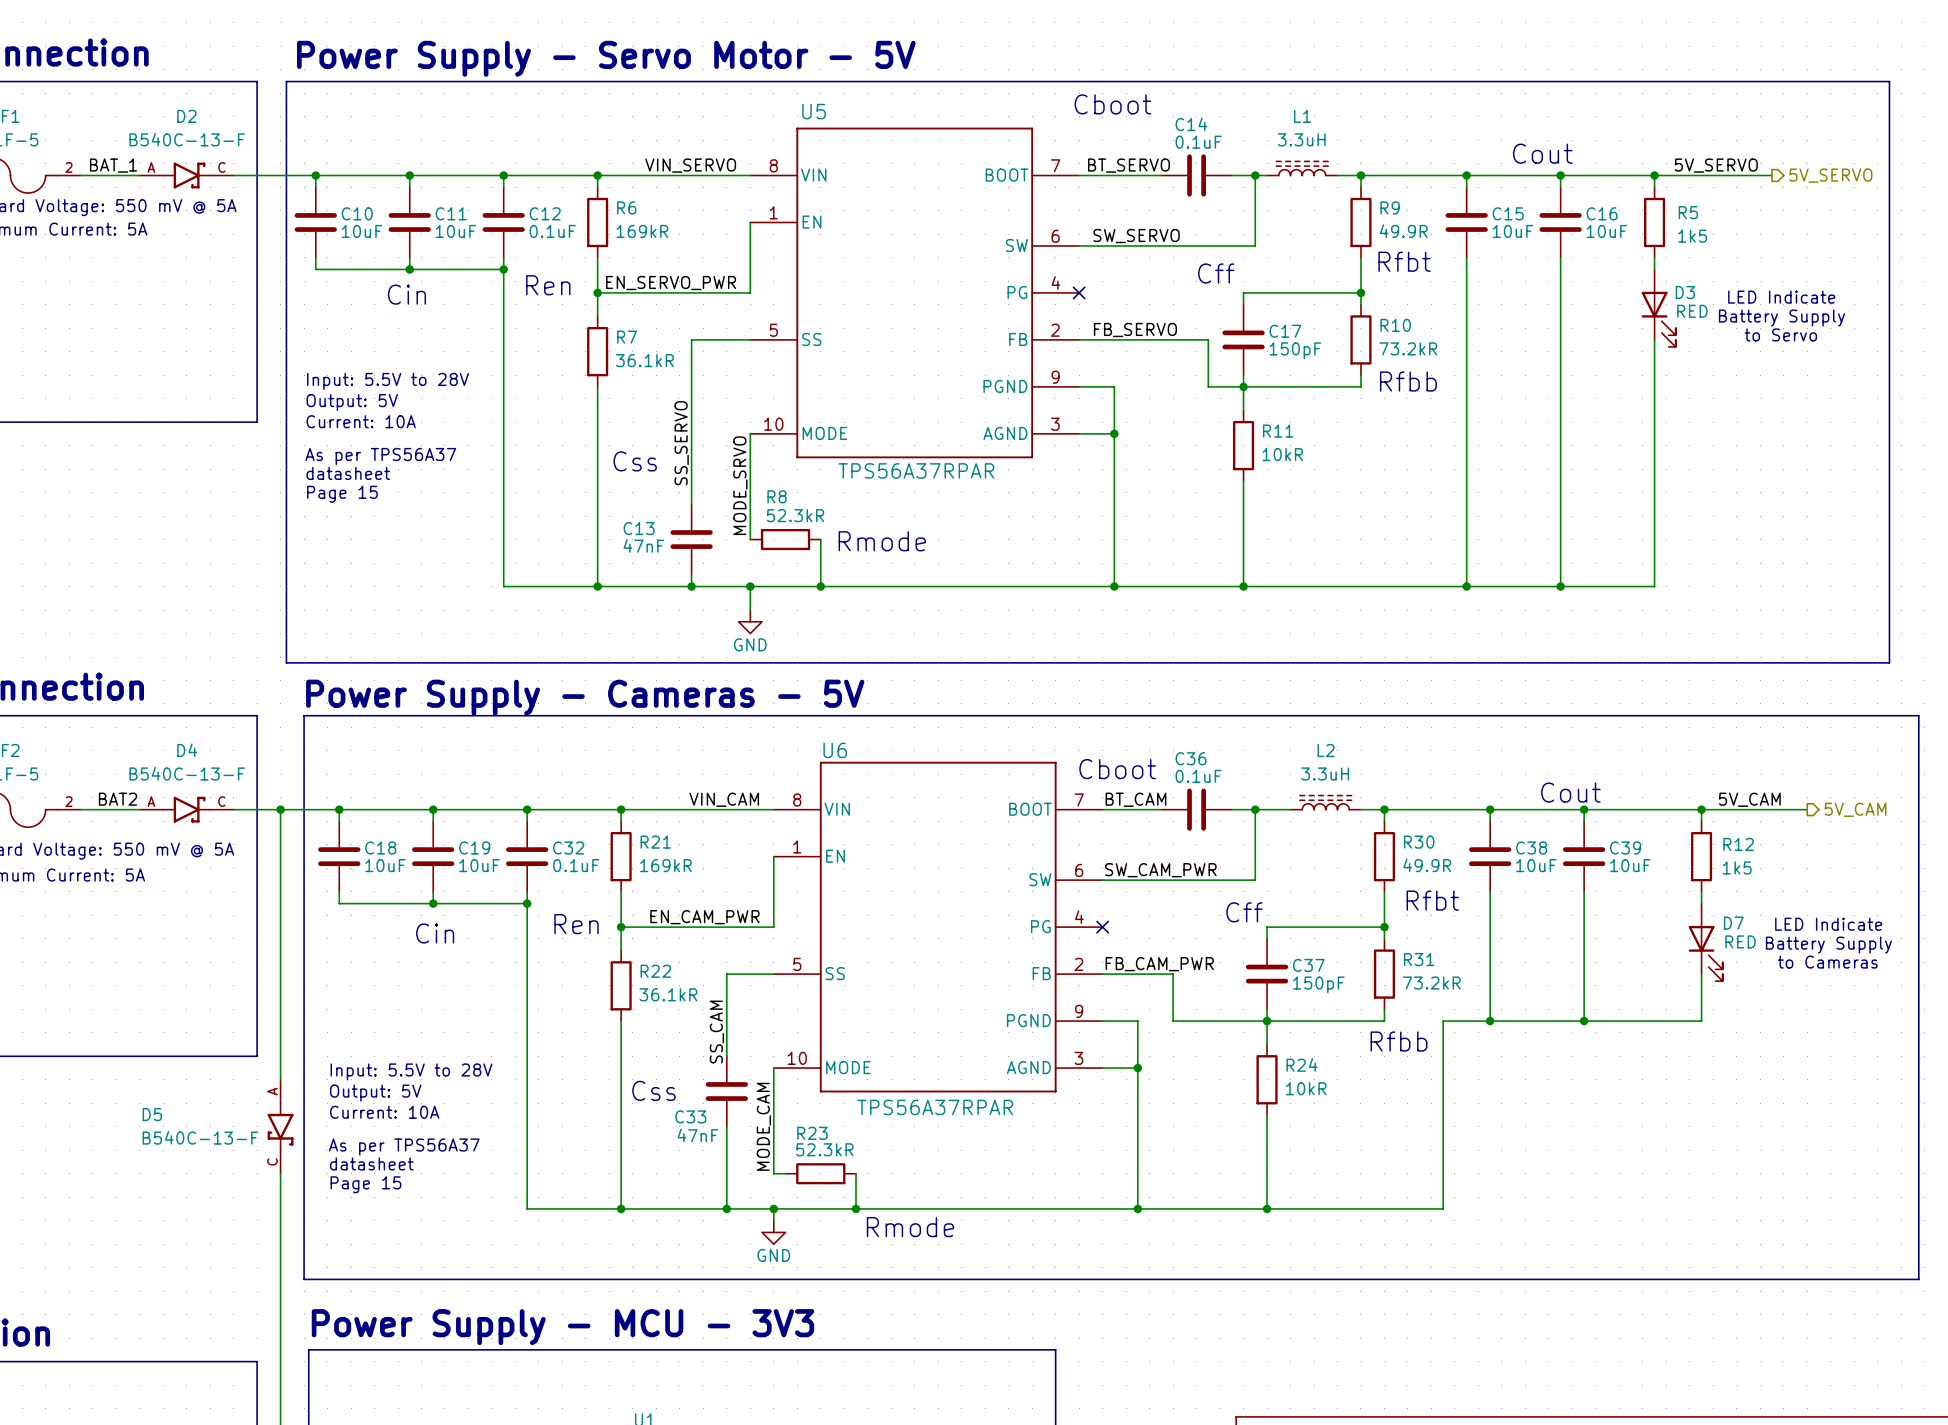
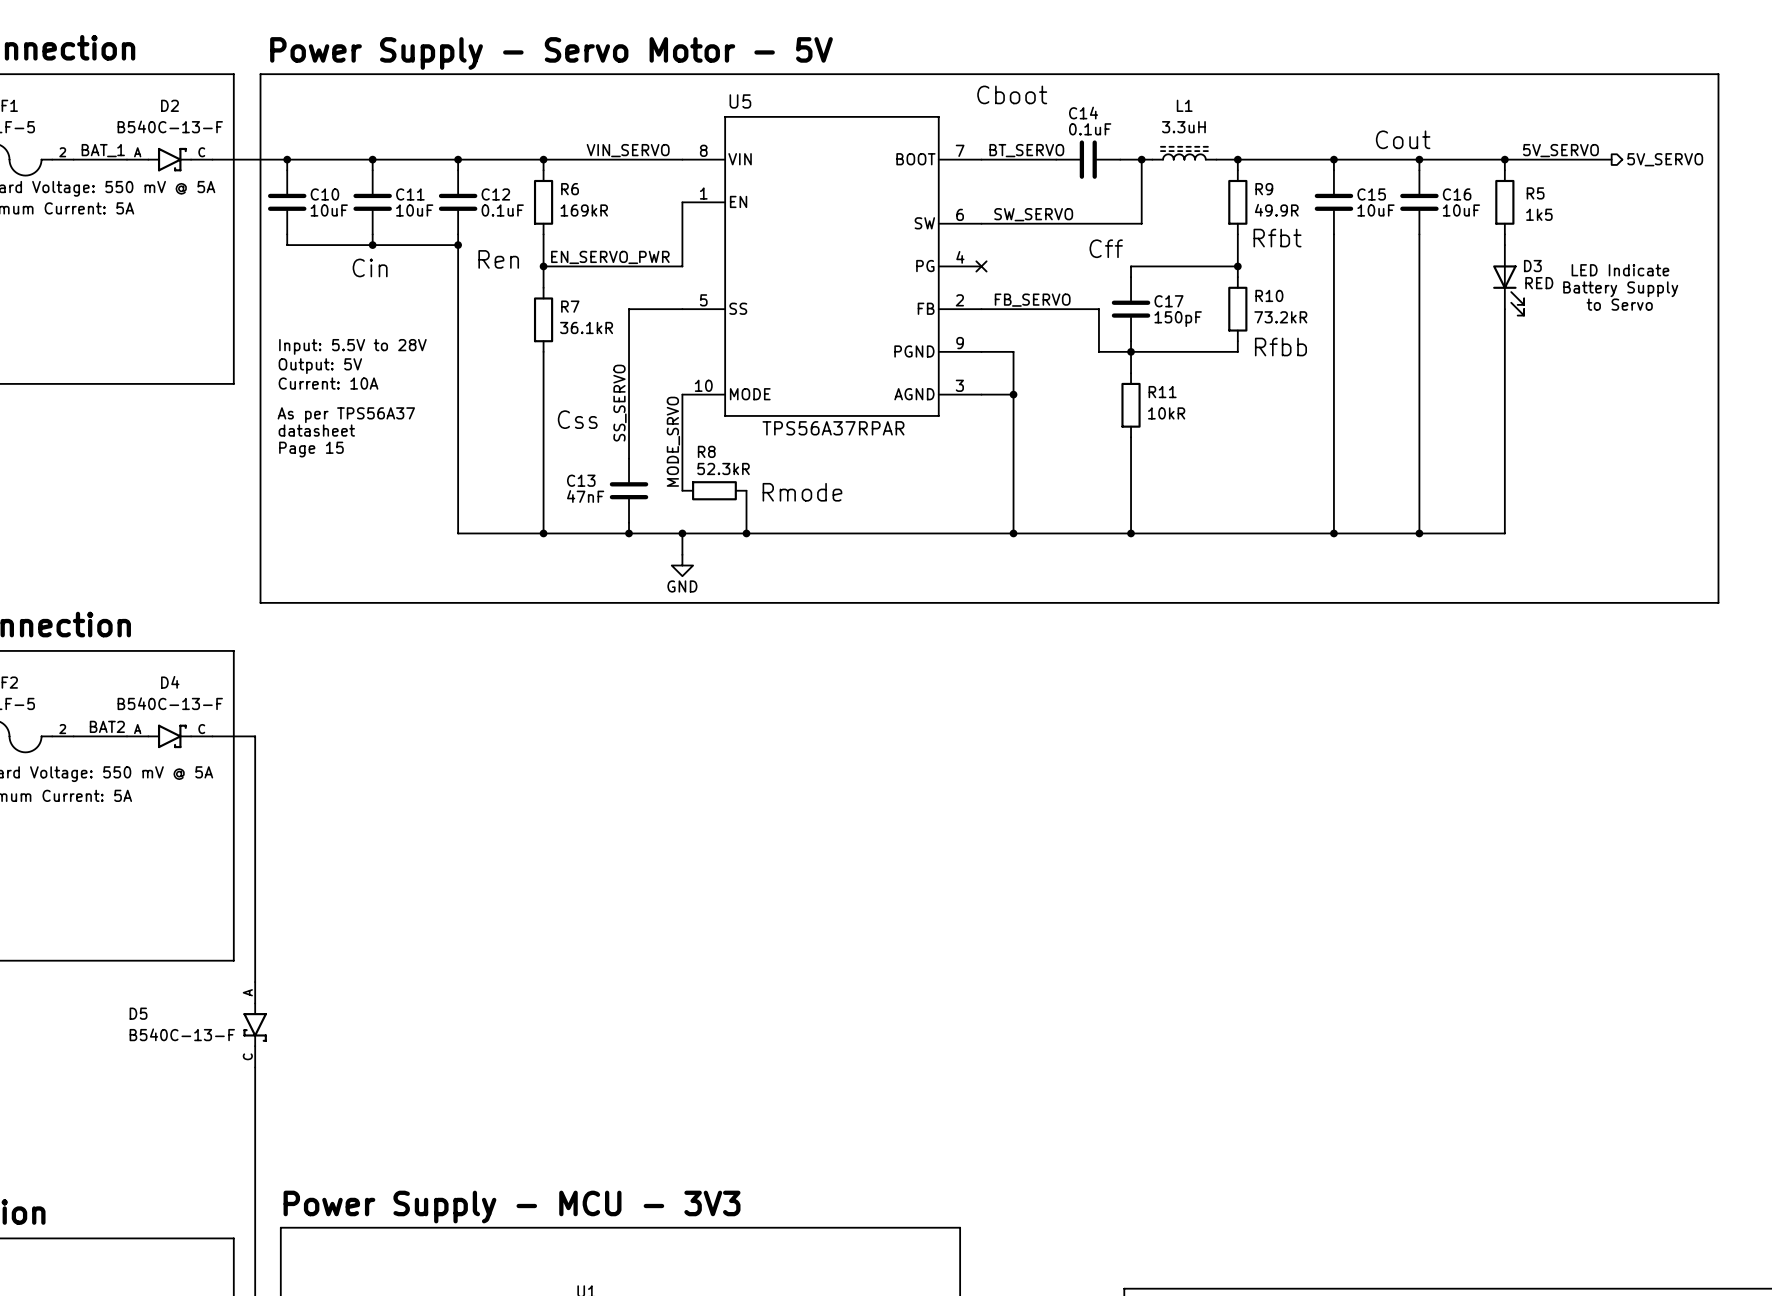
text: Power Supply - Cameras - 5V (585, 697) -> none
line: (304, 715) (304, 1279) (1918, 1279) (1918, 715) (304, 715) -> none
text: Cboot (1117, 769) -> none
text: Cout (1570, 792) -> none
label: VIN_CAM (724, 799) -> none
label: BT_CAM (1135, 799) -> none
label: 5V_CAM (1749, 799) -> none
L2: 3.3uH (1325, 802) -> none
wire: (280, 809) (773, 809) -> none
junction: (280, 809) -> none
wire: (339, 809) (339, 821) -> none
junction: (339, 809) -> none
wire: (433, 809) (433, 821) -> none
junction: (433, 809) -> none
wire: (527, 809) (527, 821) -> none
junction: (527, 809) -> none
wire: (621, 809) (621, 821) -> none
junction: (621, 809) -> none
wire: (1102, 809) (1161, 809) -> none
C36: 0.1uF (1196, 809) -> none
wire: (1231, 809) (1290, 809) -> none
wire: (1255, 809) (1255, 880) (1102, 880) -> none
junction: (1255, 809) -> none
wire: (1360, 809) (1807, 809) -> none
wire: (1384, 809) (1384, 821) -> none
junction: (1384, 809) -> none
wire: (1490, 809) (1490, 821) -> none
junction: (1490, 809) -> none
wire: (1584, 809) (1584, 821) -> none
junction: (1584, 809) -> none
wire: (1701, 809) (1701, 821) -> none
junction: (1701, 809) -> none
hierarchical label: 5V_CAM (1855, 809) -> none
C18: 10uF (339, 856) -> none
C19: 10uF (433, 856) -> none
C32: 0.1uF (527, 856) -> none
R21: 169kR (621, 856) -> none
wire: (773, 856) (773, 927) (621, 927) -> none
R30: 49.9R (1384, 856) -> none
C38: 10uF (1490, 856) -> none
C39: 10uF (1584, 856) -> none
R12: 1k5 (1701, 856) -> none
label: SW_CAM_PWR (1160, 870) -> none
wire: (339, 891) (339, 903) (527, 903) -> none
wire: (433, 891) (433, 903) -> none
wire: (527, 891) (527, 1208) (1443, 1208) (1443, 1021) (1701, 1021) (1701, 974) -> none
wire: (621, 891) (621, 950) -> none
wire: (1384, 891) (1384, 938) -> none
wire: (1490, 891) (1490, 1021) -> none
wire: (1584, 891) (1584, 1021) -> none
wire: (1701, 891) (1701, 903) -> none
text: Rfbt (1432, 900) -> none
junction: (433, 903) -> none
junction: (527, 903) -> none
text: Cff (1244, 912) -> none
label: EN_CAM_PWR (704, 917) -> none
text: Ren (576, 924) -> none
text: LED Indicate (1828, 924) -> none
junction: (621, 927) -> none
U6: TPS56A37RPAR (938, 927) -> none
no-connect mark: (1102, 927) -> none
wire: (1384, 927) (1267, 927) (1267, 938) -> none
junction: (1384, 927) -> none
text: Cin (435, 933) -> none
D7: RED (1705, 942) -> none
text: Battery Supply (1828, 945) -> none
text: to Cameras (1827, 962) -> none
label: FB_CAM_PWR (1159, 964) -> none
wire: (773, 974) (726, 974) (726, 1056) -> none
wire: (1102, 974) (1173, 974) (1173, 1021) (1384, 1021) (1384, 1009) -> none
C37: 150pF (1267, 974) -> none
R31: 73.2kR (1384, 974) -> none
R22: 36.1kR (621, 985) -> none
wire: (1267, 1009) (1267, 1044) -> none
wire: (621, 1021) (621, 1208) -> none
wire: (1102, 1021) (1137, 1021) (1137, 1208) -> none
junction: (1267, 1021) -> none
junction: (1490, 1021) -> none
junction: (1584, 1021) -> none
label: SS_CAM (716, 1032) -> none
text: Rfbb (1399, 1041) -> none
wire: (773, 1068) (773, 1173) (785, 1173) -> none
wire: (1102, 1068) (1137, 1068) -> none
junction: (1137, 1068) -> none
text: Input: 5.5V to 28V (411, 1071) -> none
R24: 10kR (1267, 1079) -> none
text: Css (654, 1090) -> none
C33: 47nF (726, 1091) -> none
text: Output: 5V (375, 1093) -> none
text: Current: 10A (384, 1112) -> none
wire: (1267, 1115) (1267, 1208) -> none
wire: (726, 1126) (726, 1208) -> none
label: MODE_CAM (763, 1126) -> none
text: As per TPS56A37 (404, 1146) -> none
text: datasheet (371, 1163) -> none
R23: 52.3kR (820, 1173) -> none
wire: (856, 1173) (856, 1208) -> none
text: Page 15 (365, 1184) -> none
junction: (621, 1208) -> none
junction: (726, 1208) -> none
wire: (773, 1208) (773, 1220) -> none
junction: (773, 1208) -> none
junction: (856, 1208) -> none
junction: (1137, 1208) -> none
junction: (1267, 1208) -> none
text: Rmode (910, 1227) -> none
power symbol: GND (773, 1232) -> none

